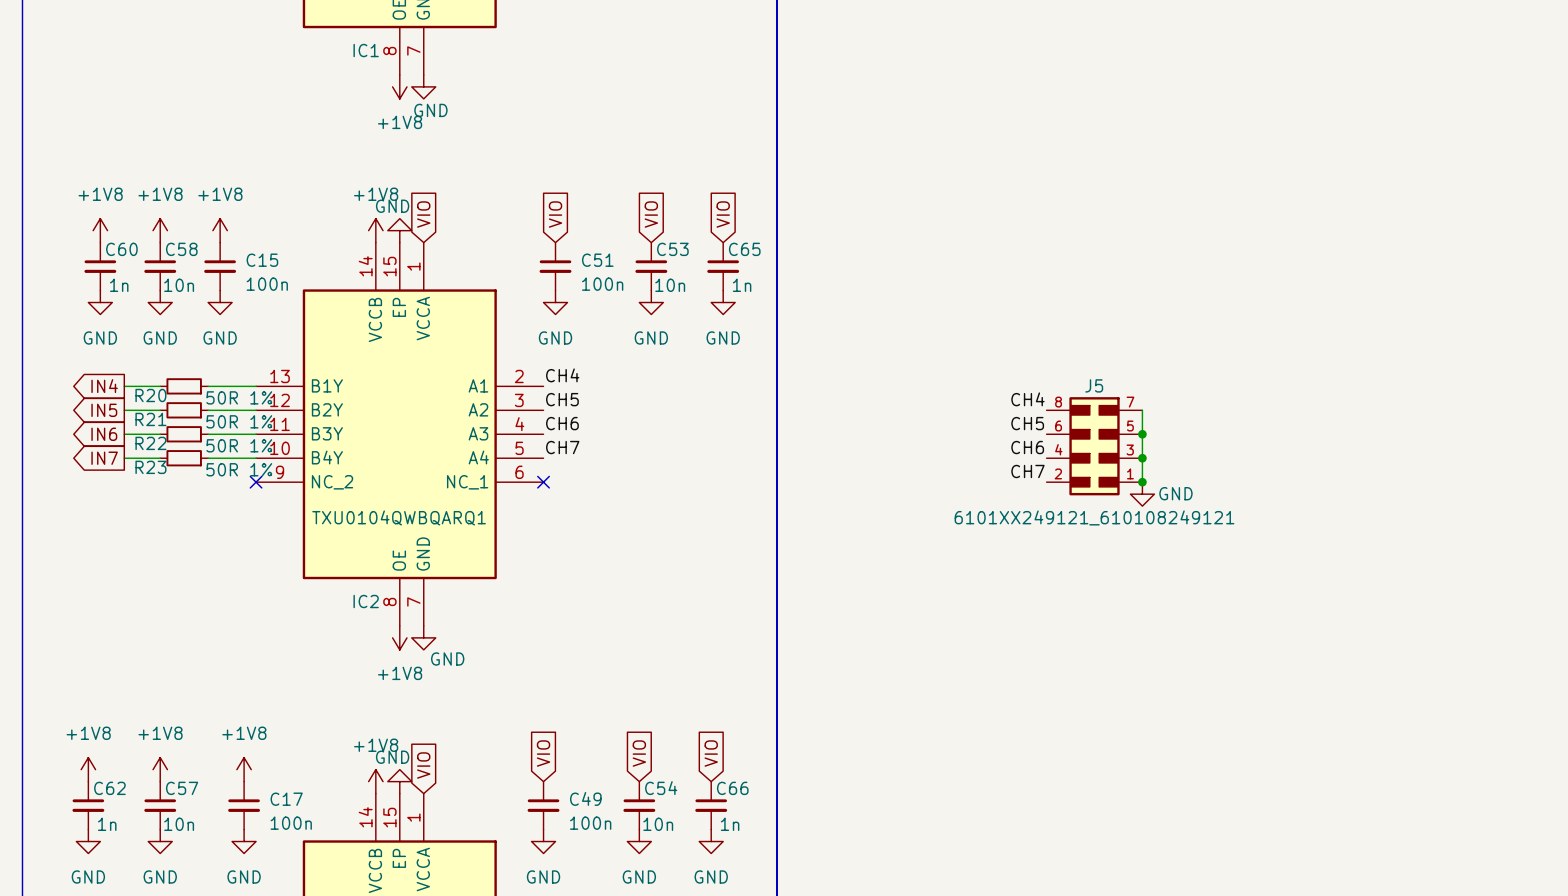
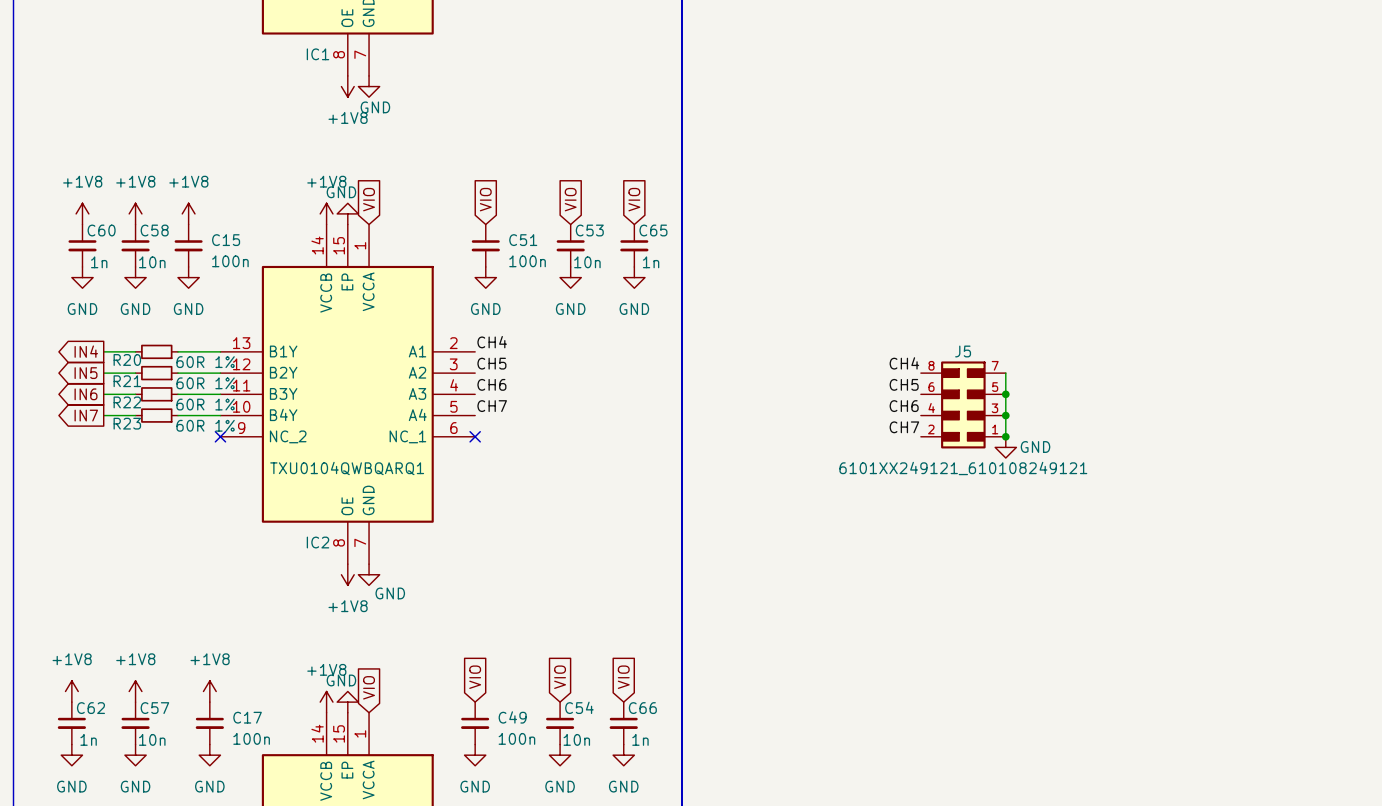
R20 value: 50R 1% (239, 397) -> 60R 1% (205, 362)
R21 value: 50R 1% (239, 421) -> 60R 1% (205, 383)
R22 value: 50R 1% (239, 445) -> 60R 1% (205, 404)
R23 value: 50R 1% (239, 469) -> 60R 1% (205, 425)

